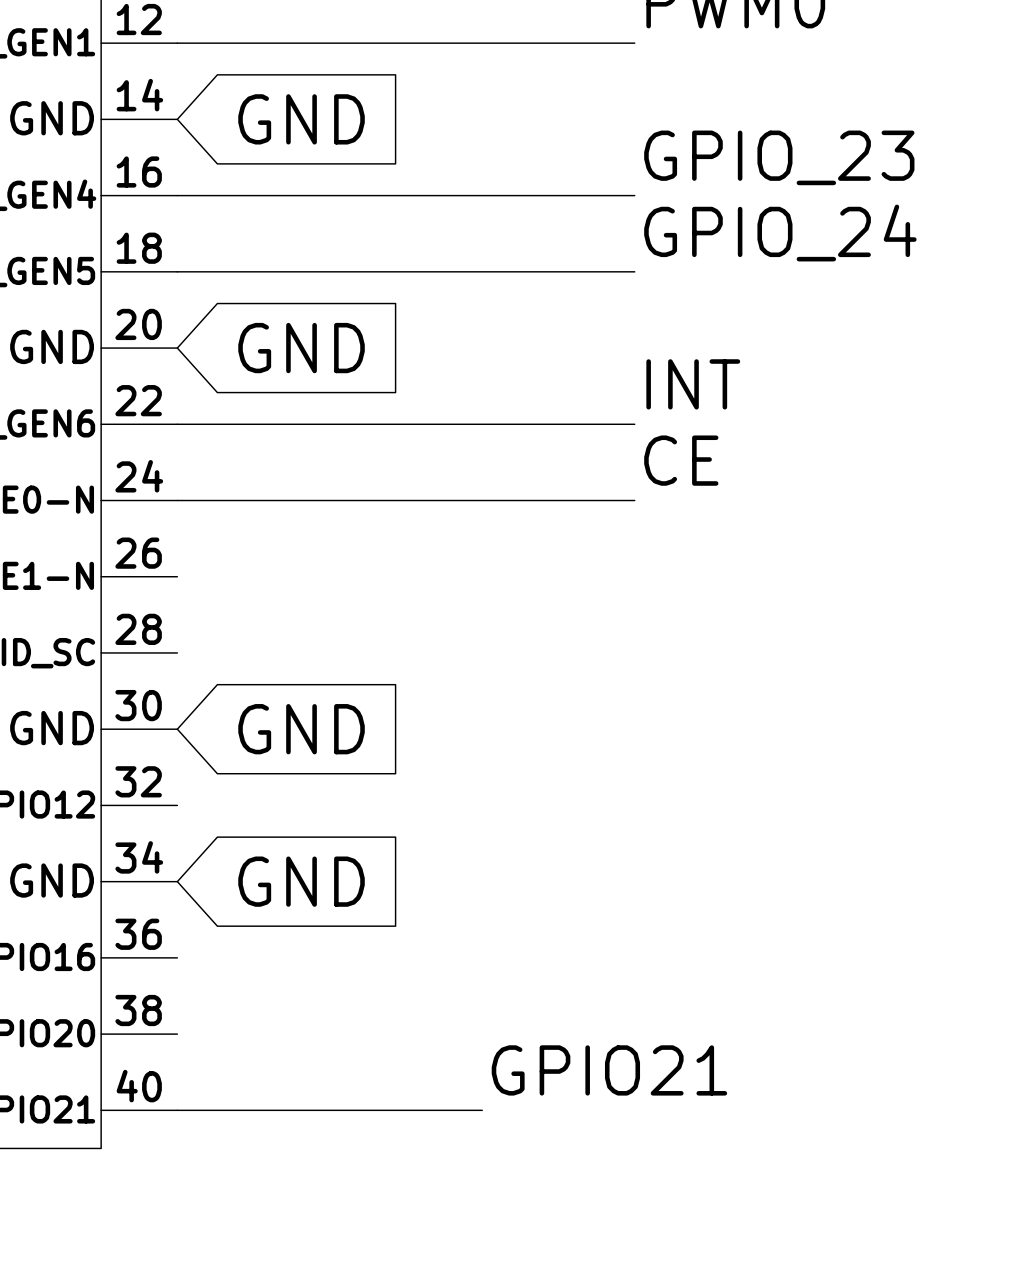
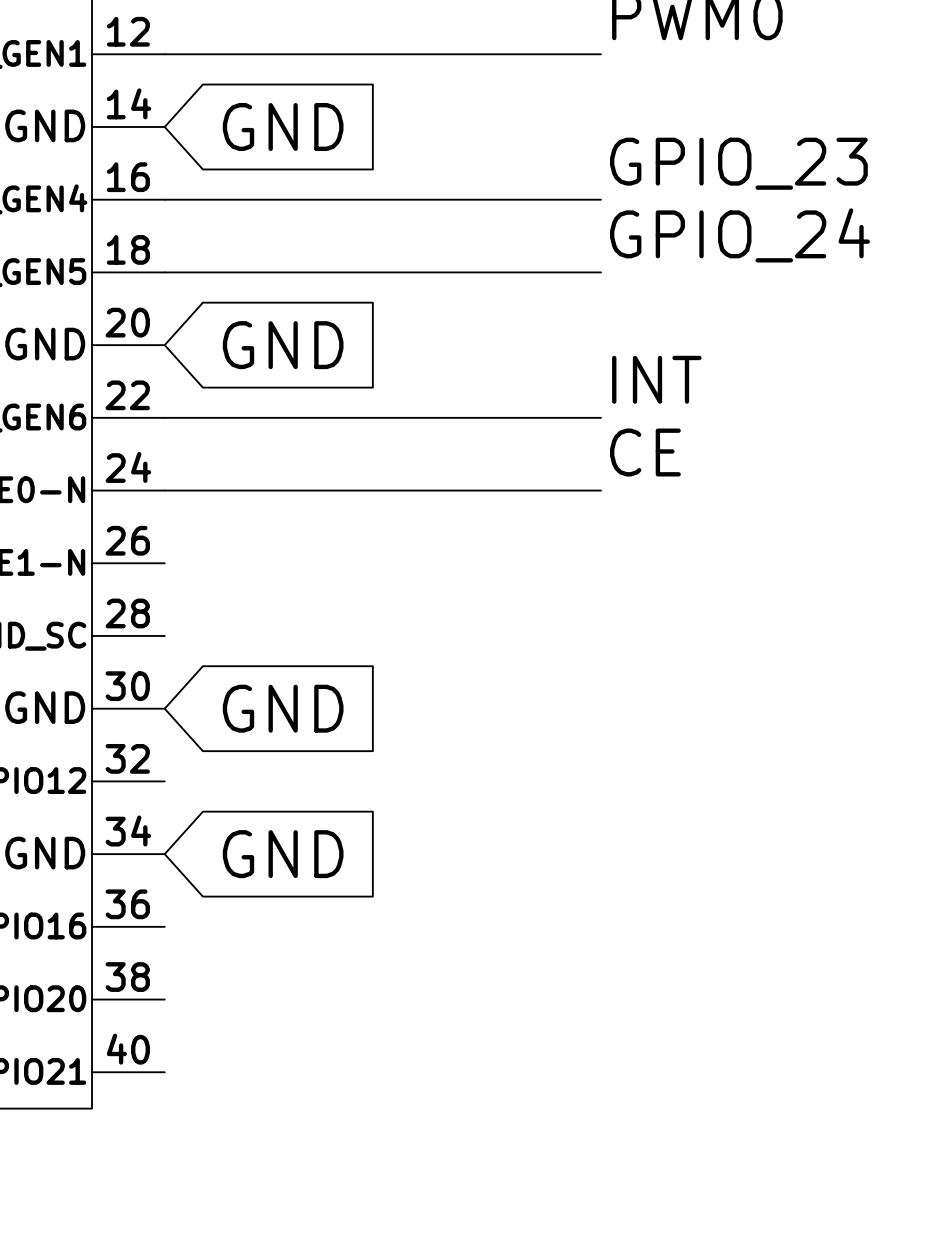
label: GPIO21 (609, 1070) -> none
wire: (177, 1110) (482, 1110) -> none

